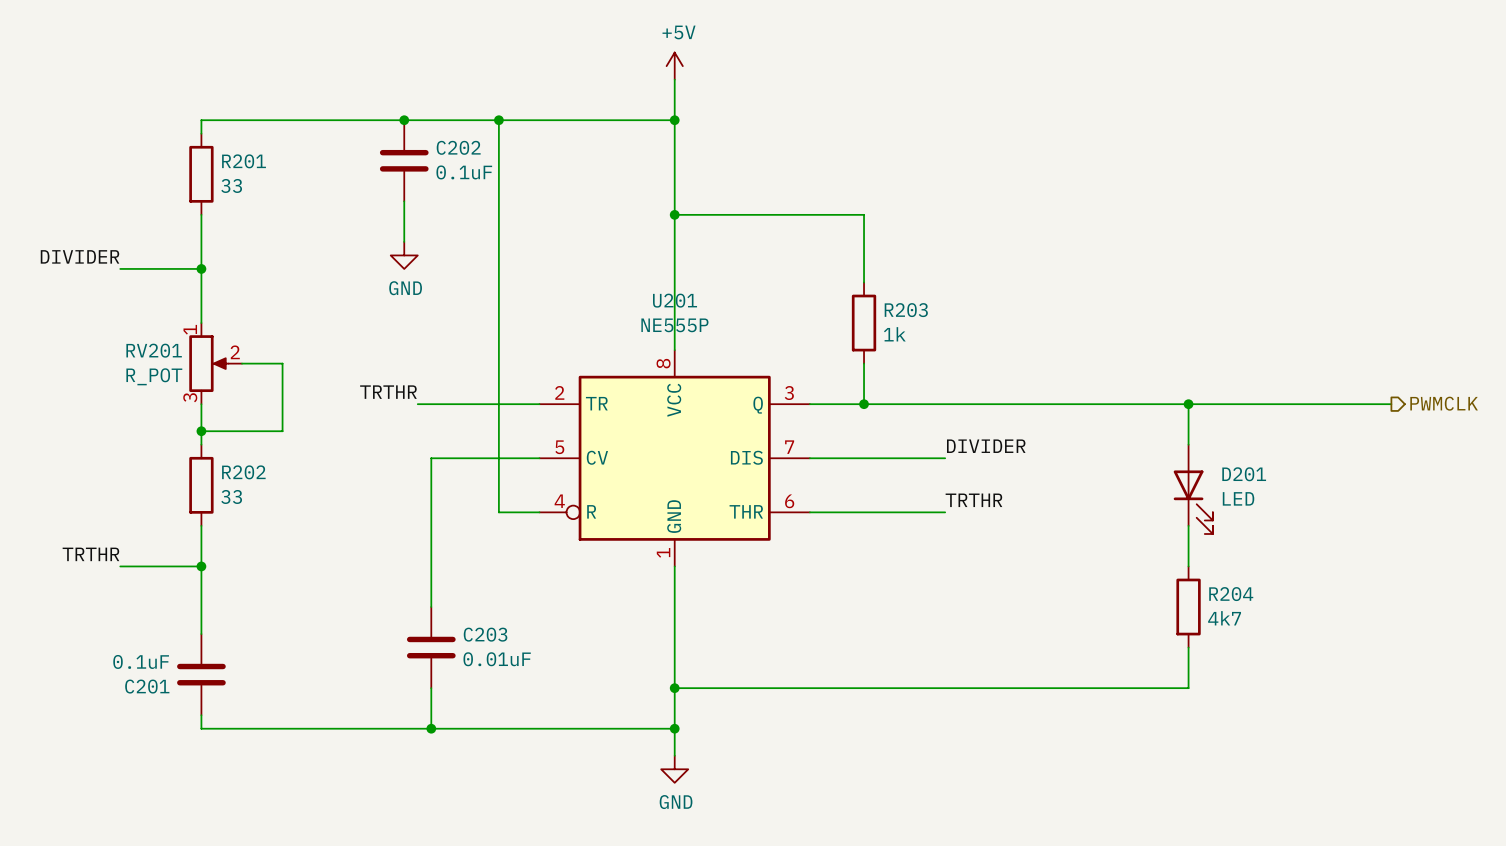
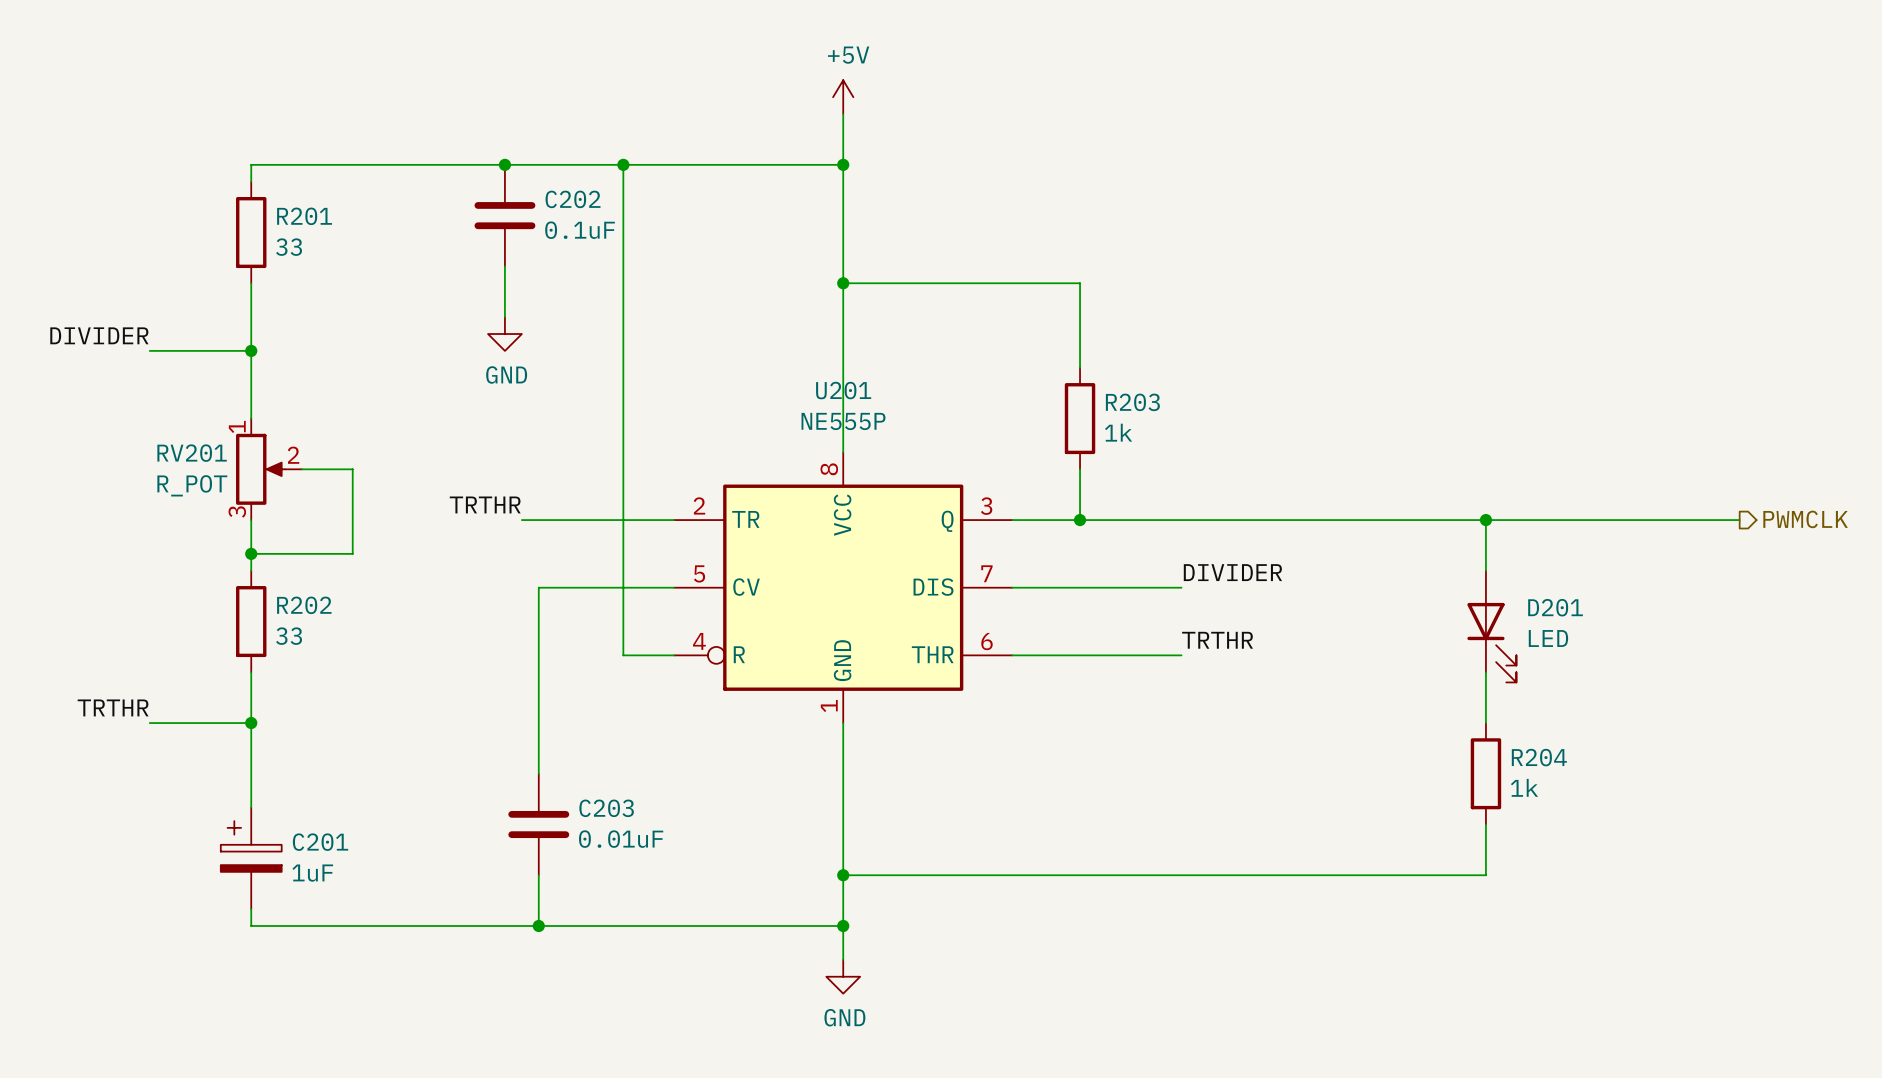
R204 value: 4k7 (1224, 618) -> 1k (1524, 787)
C201 symbol: [177, 634, 226, 716] -> [220, 807, 282, 910]
C201 value: 0.1uF (141, 661) -> 1uF (312, 873)
C201 name position: C201 (147, 686) -> C201 (320, 842)

